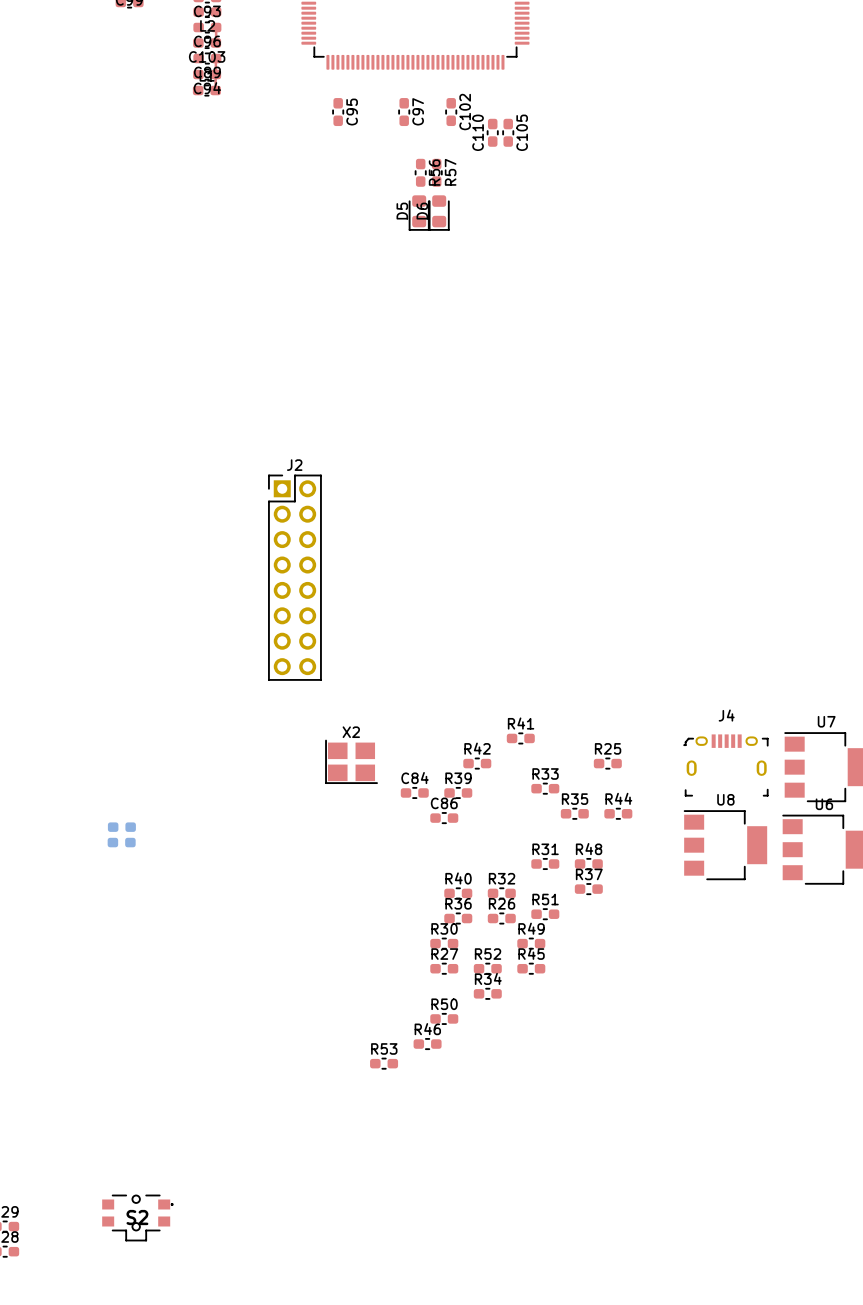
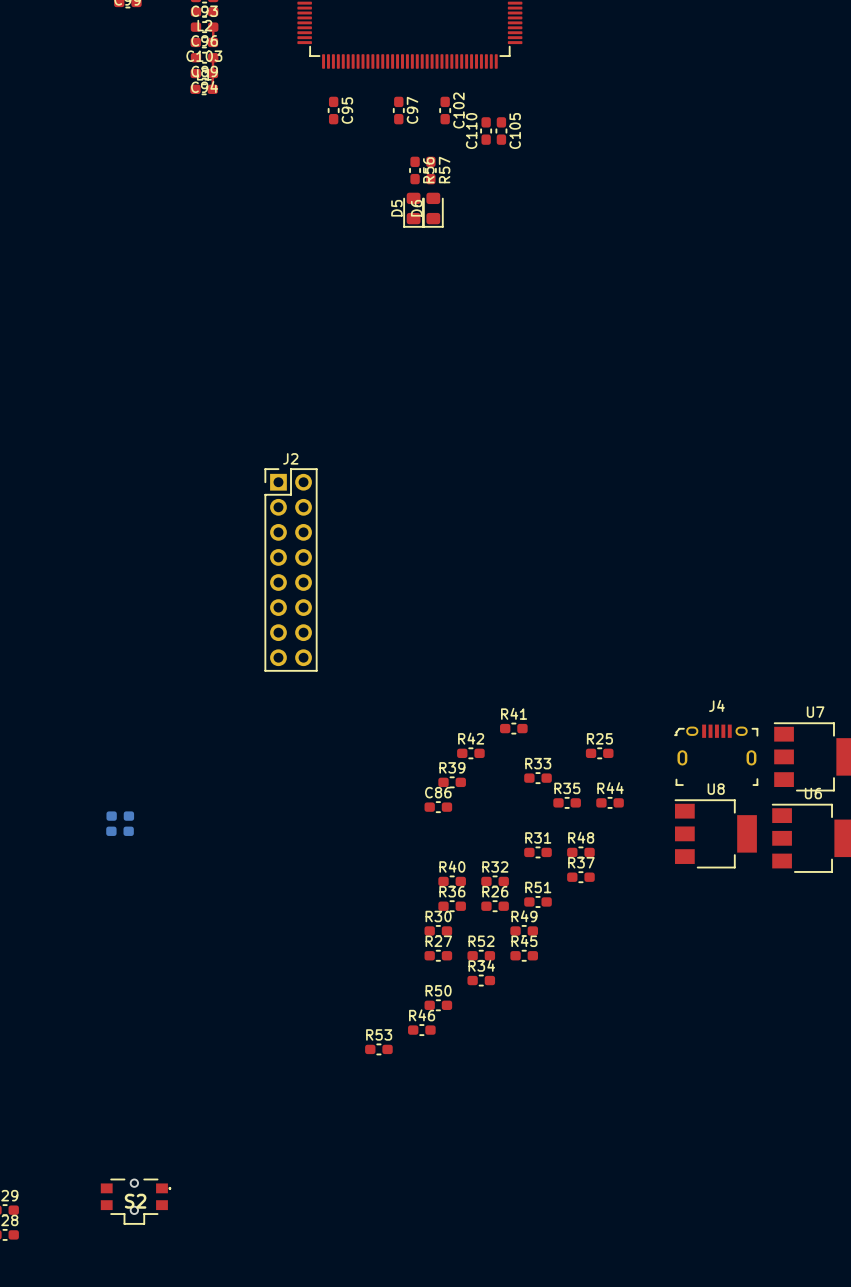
X2: (351, 761) -> none
C84: (414, 792) -> none

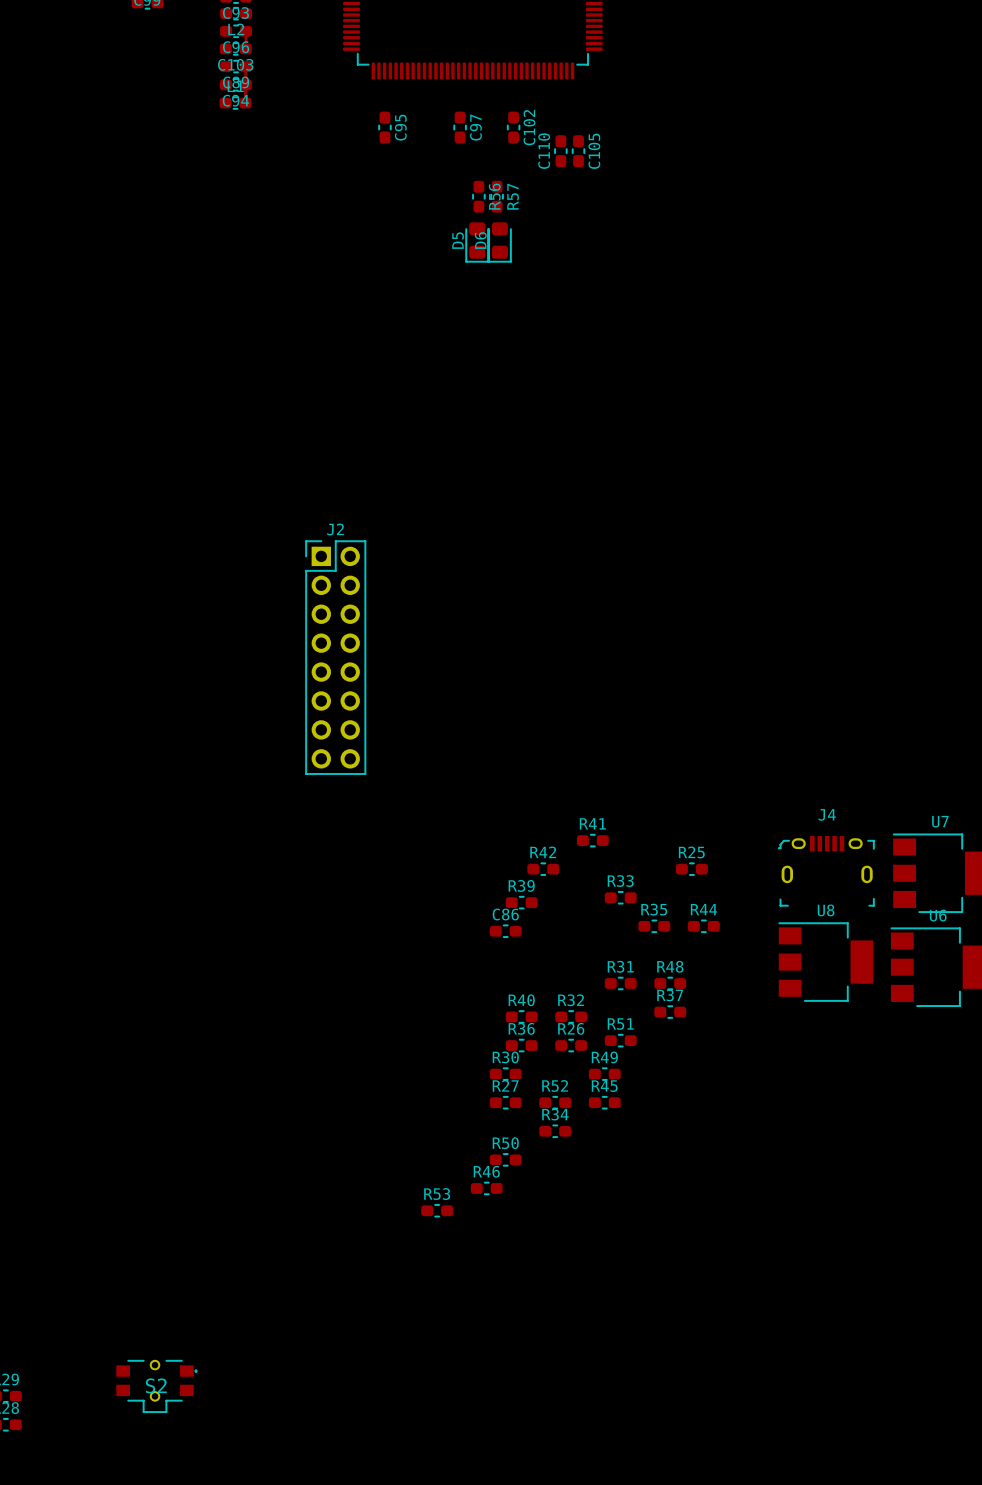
part: (120, 816) -> none
part: (120, 831) -> none

